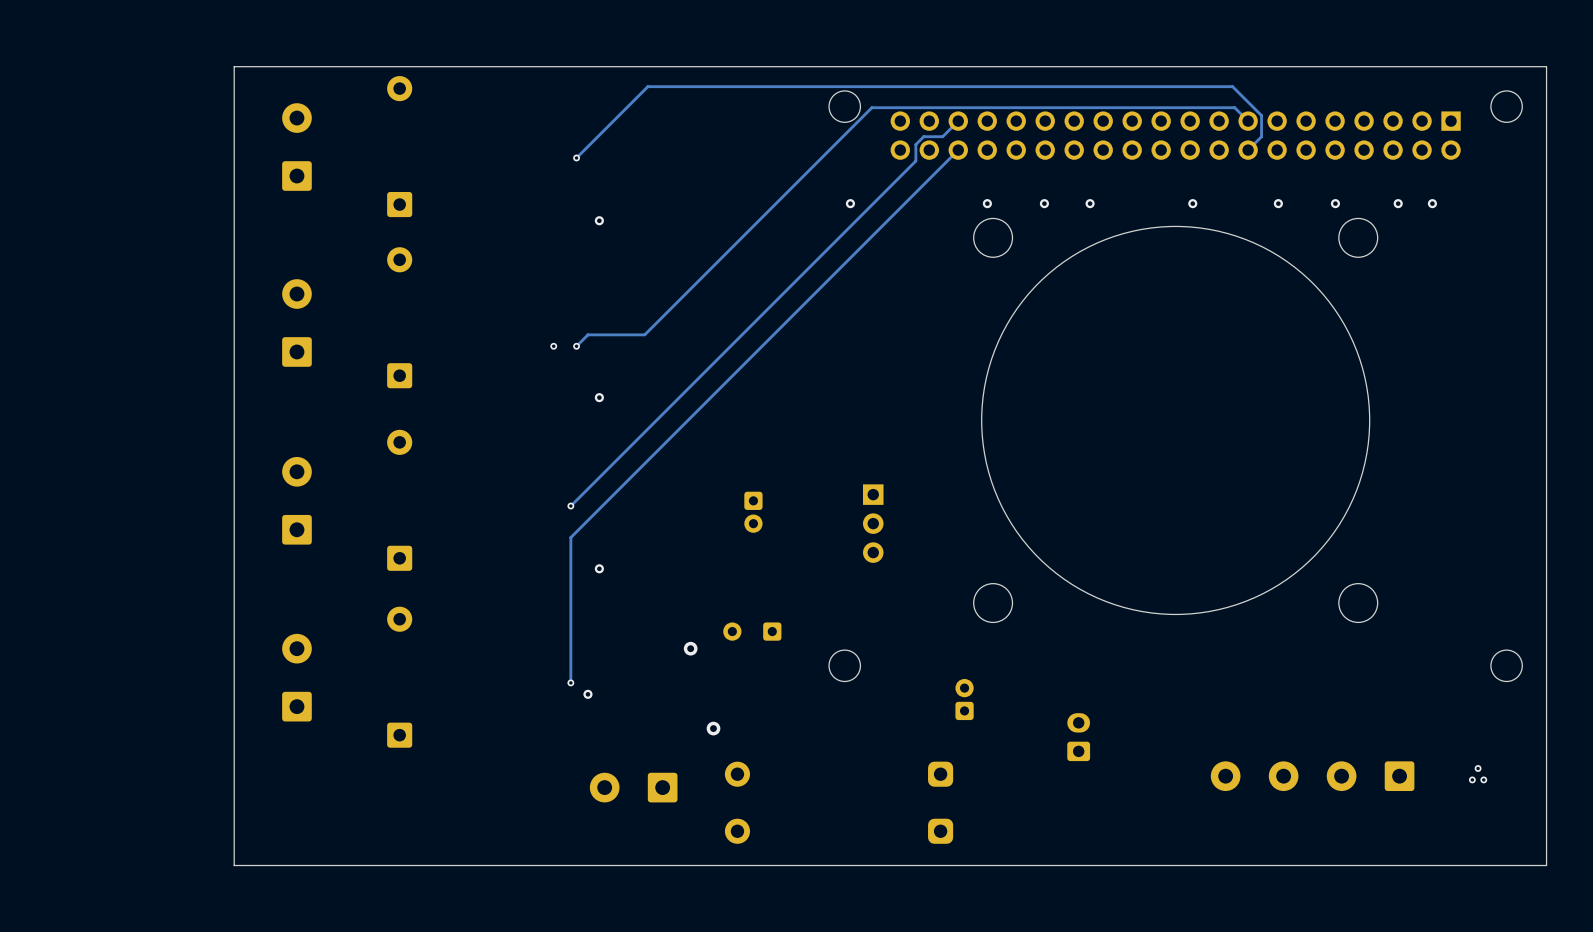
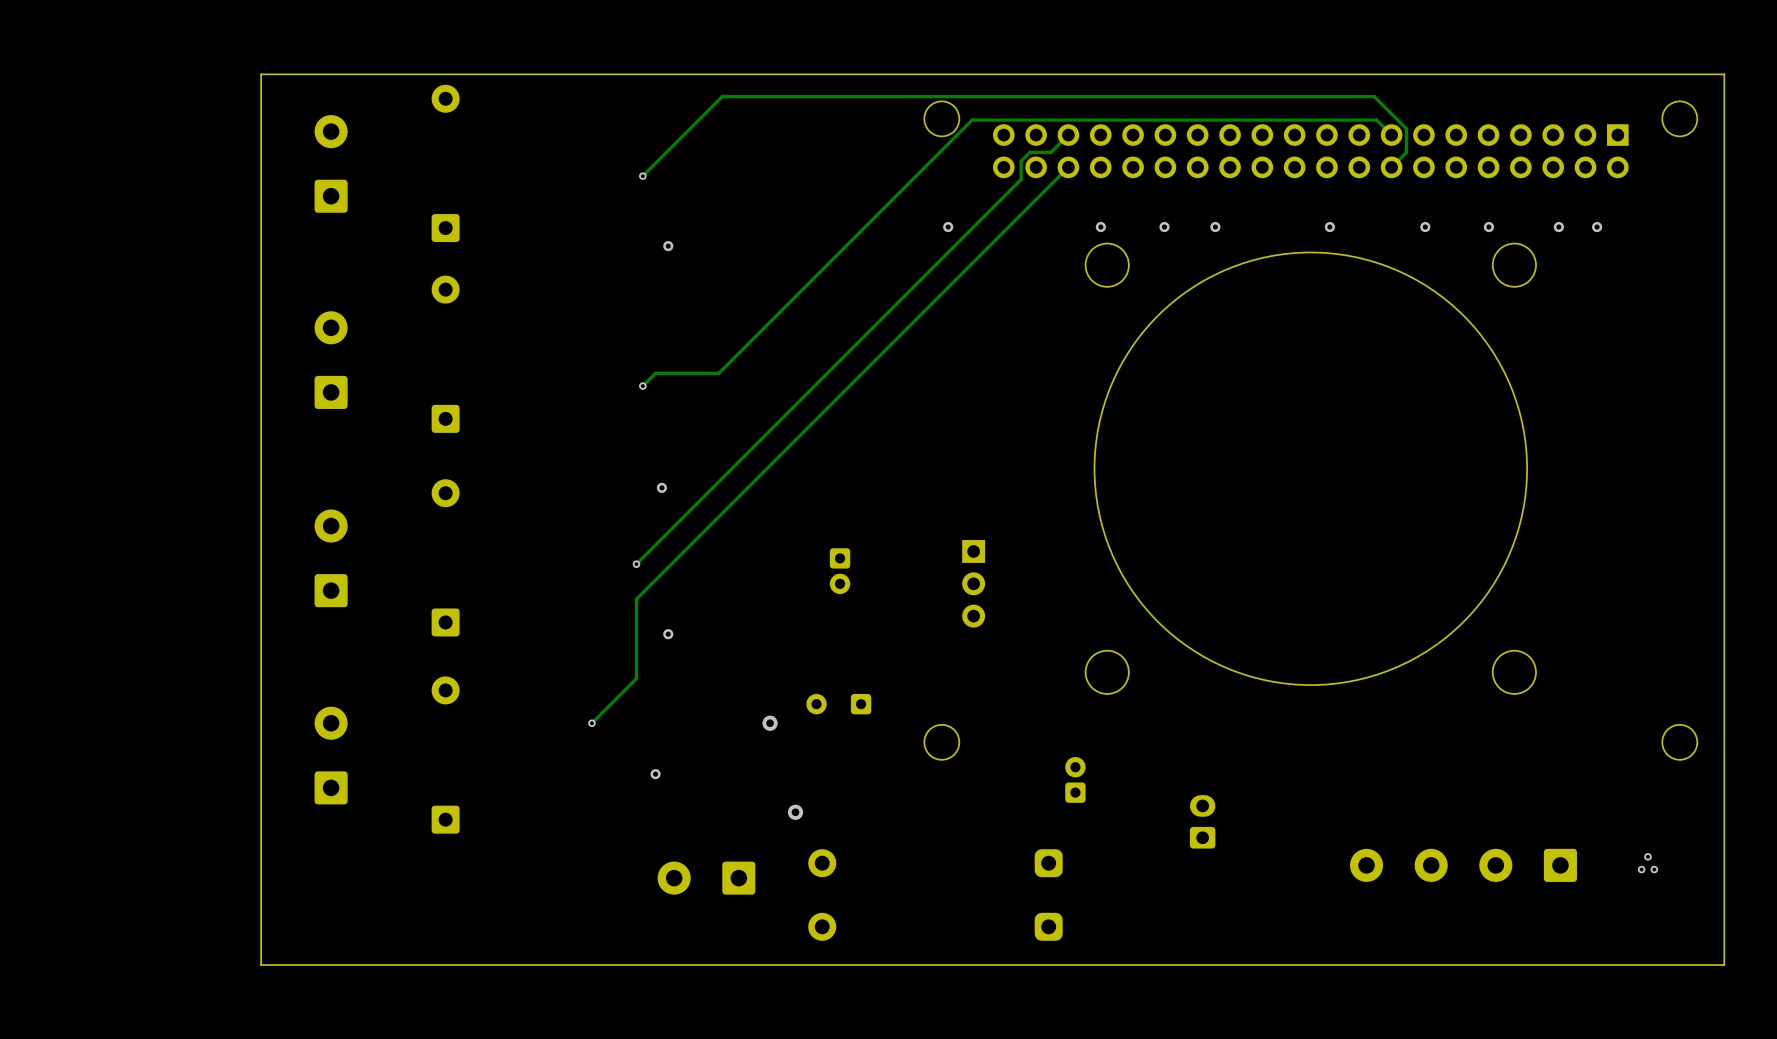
via: (553, 346) -> none
via position: (599, 397) -> (661, 487)
track: (570, 608) (570, 682) -> (636, 678) (591, 723)
via position: (570, 682) -> (591, 723)

